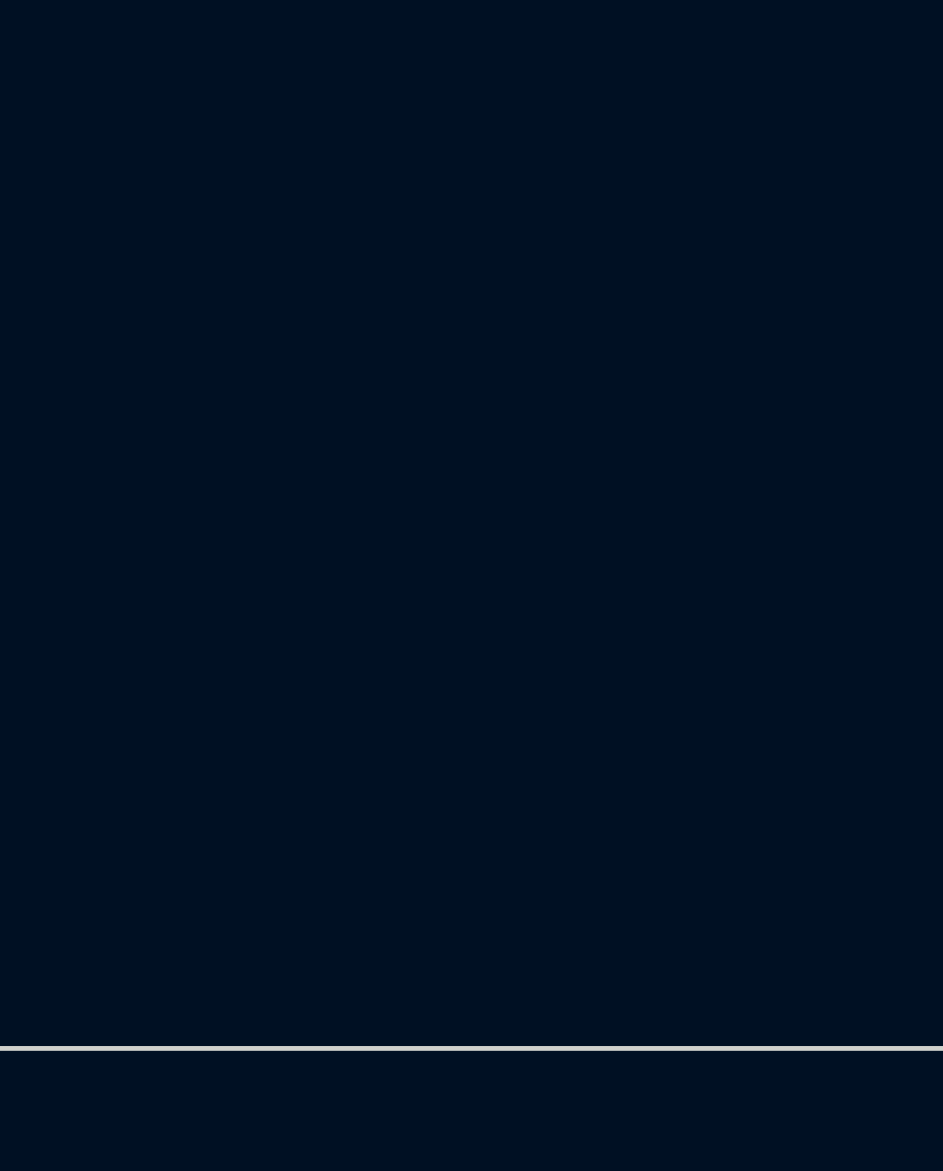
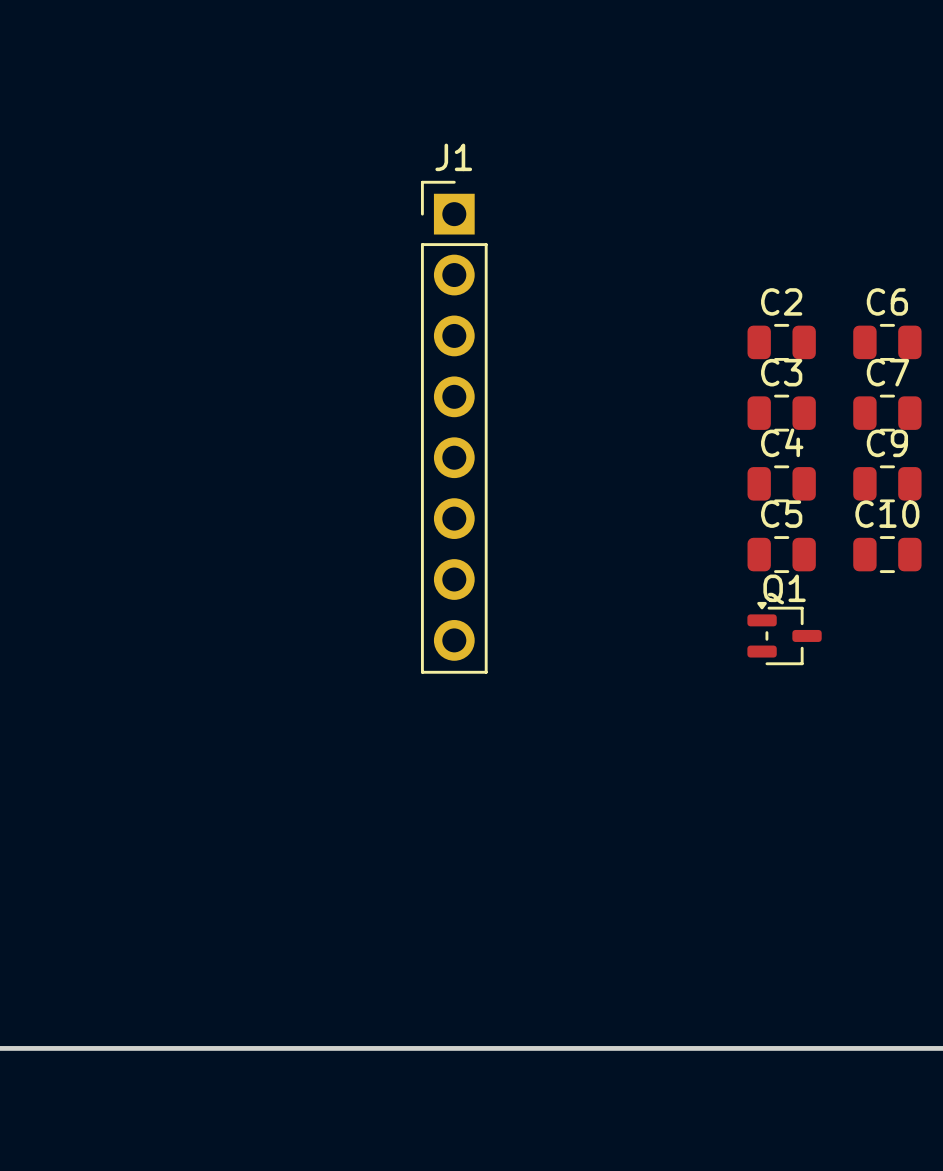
C2: none -> (781, 342)
C6: none -> (887, 342)
C3: none -> (781, 413)
C7: none -> (887, 413)
J1: none -> (454, 427)
C4: none -> (781, 483)
C9: none -> (887, 483)
C5: none -> (781, 554)
C10: none -> (887, 554)
Q1: none -> (784, 633)

